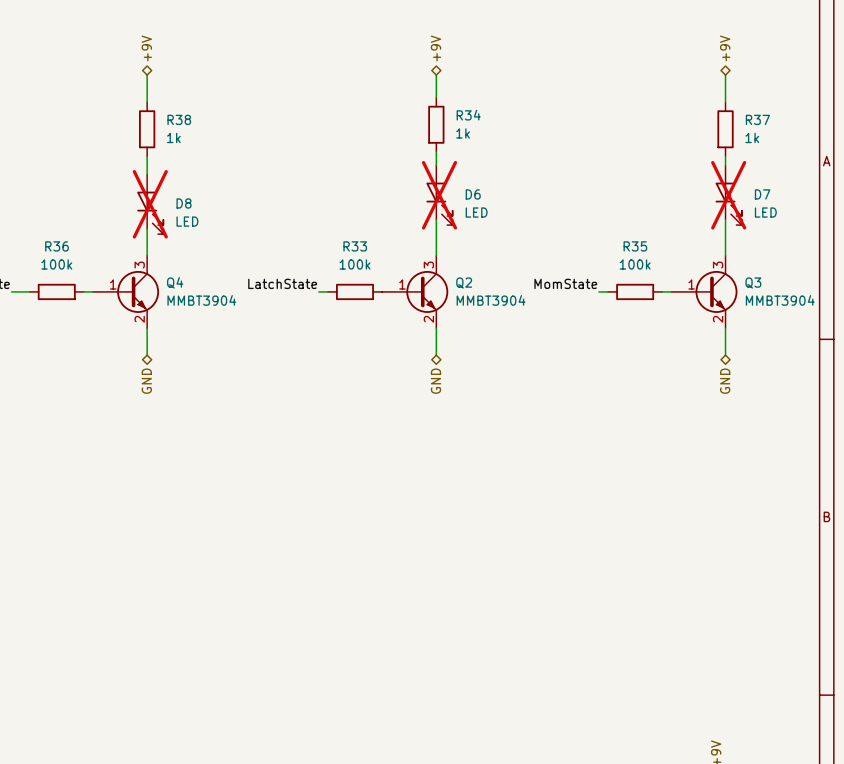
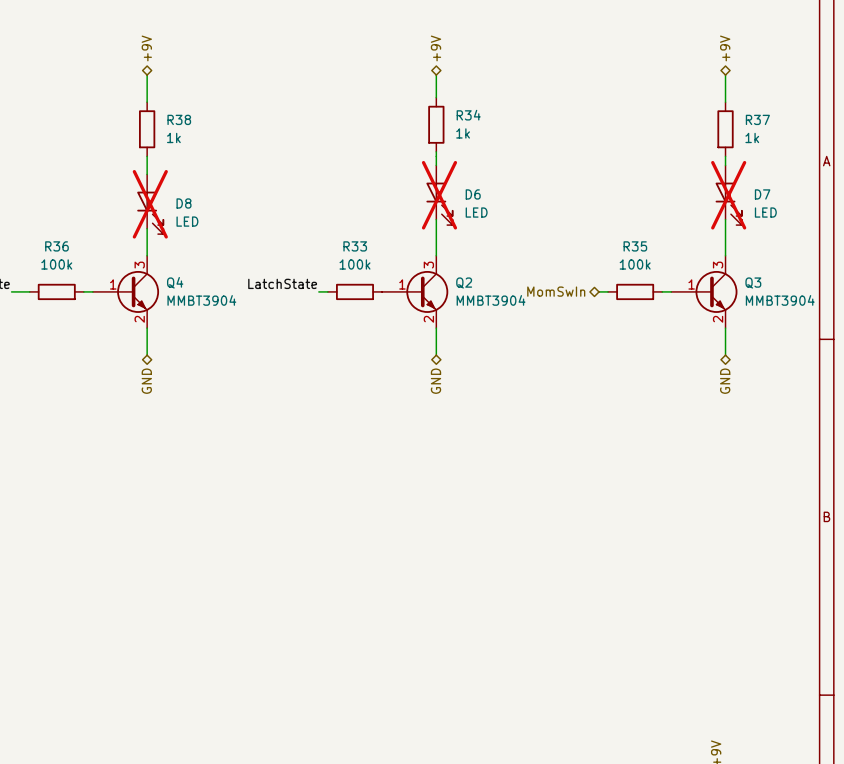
label: MomState (565, 283) -> none
hierarchical label: none -> MomSwIn (556, 291)

